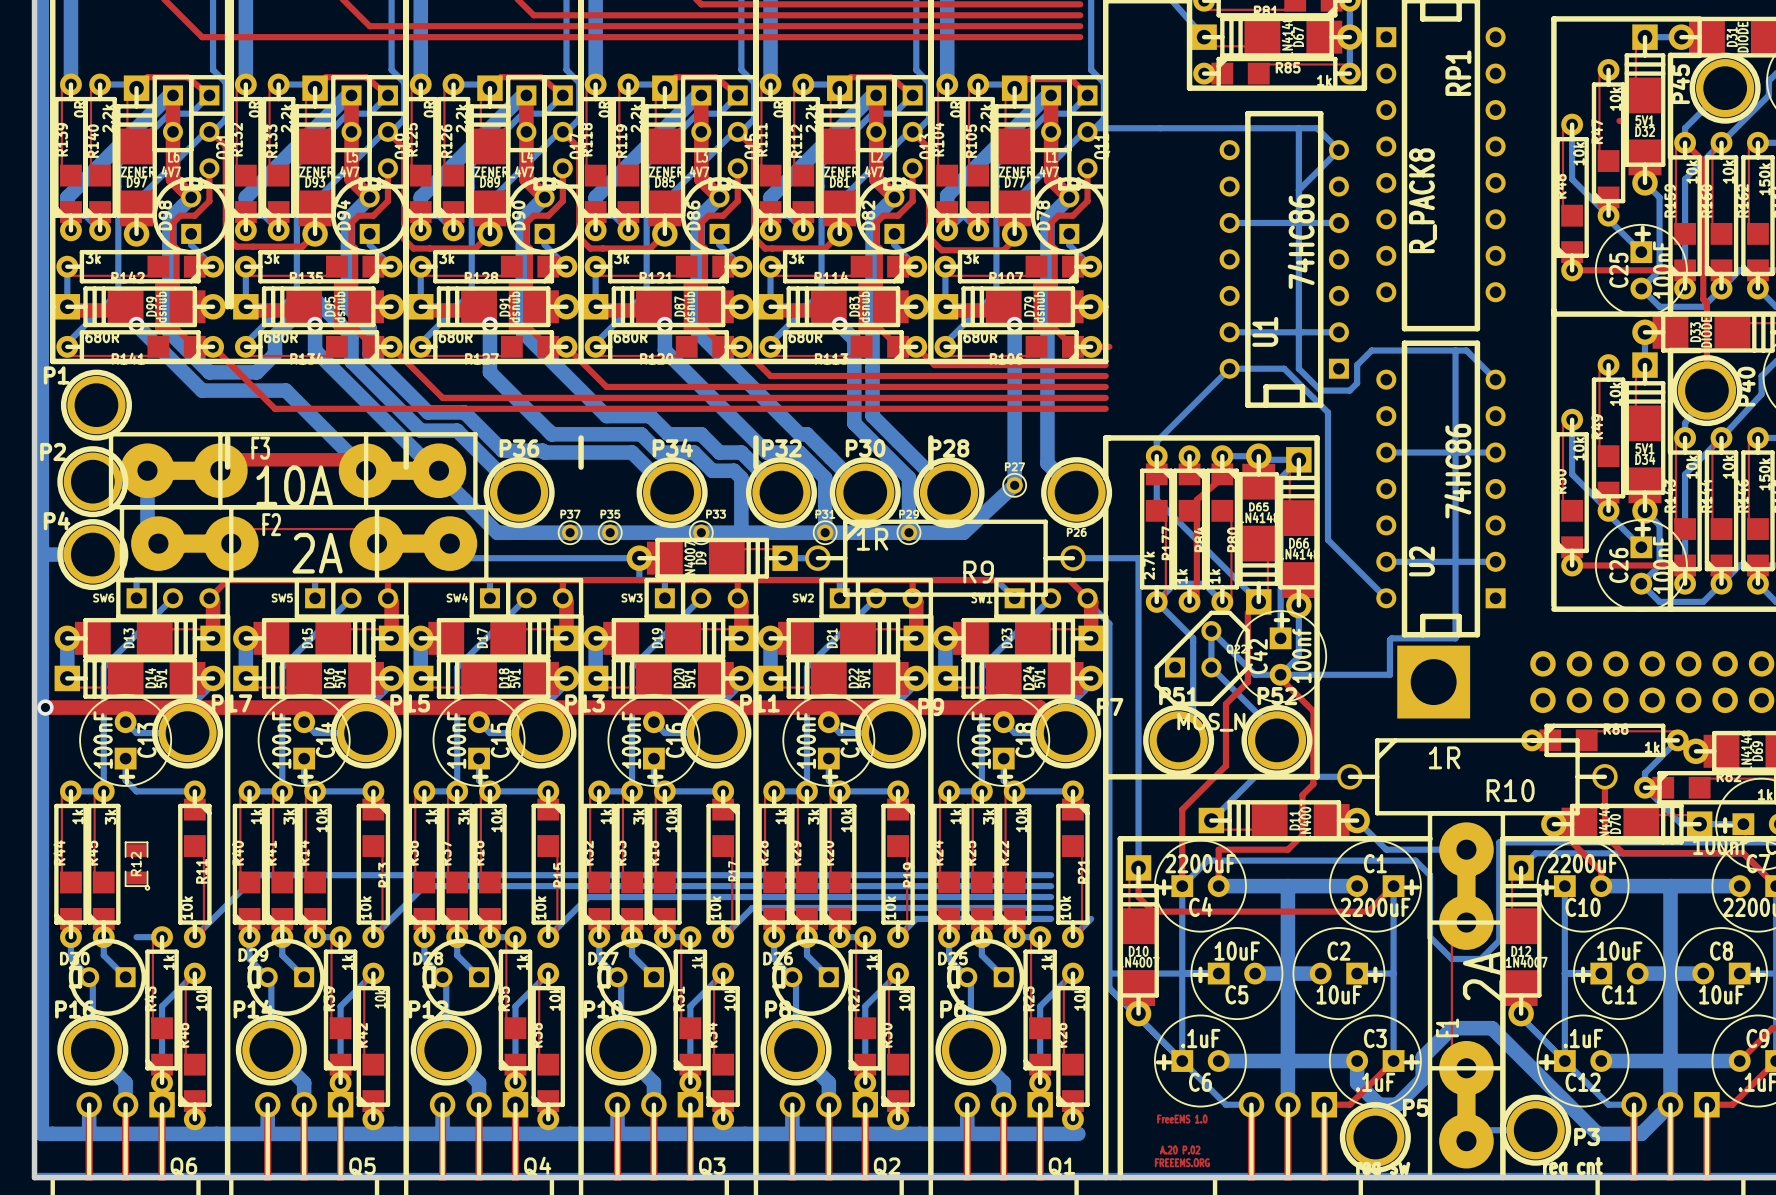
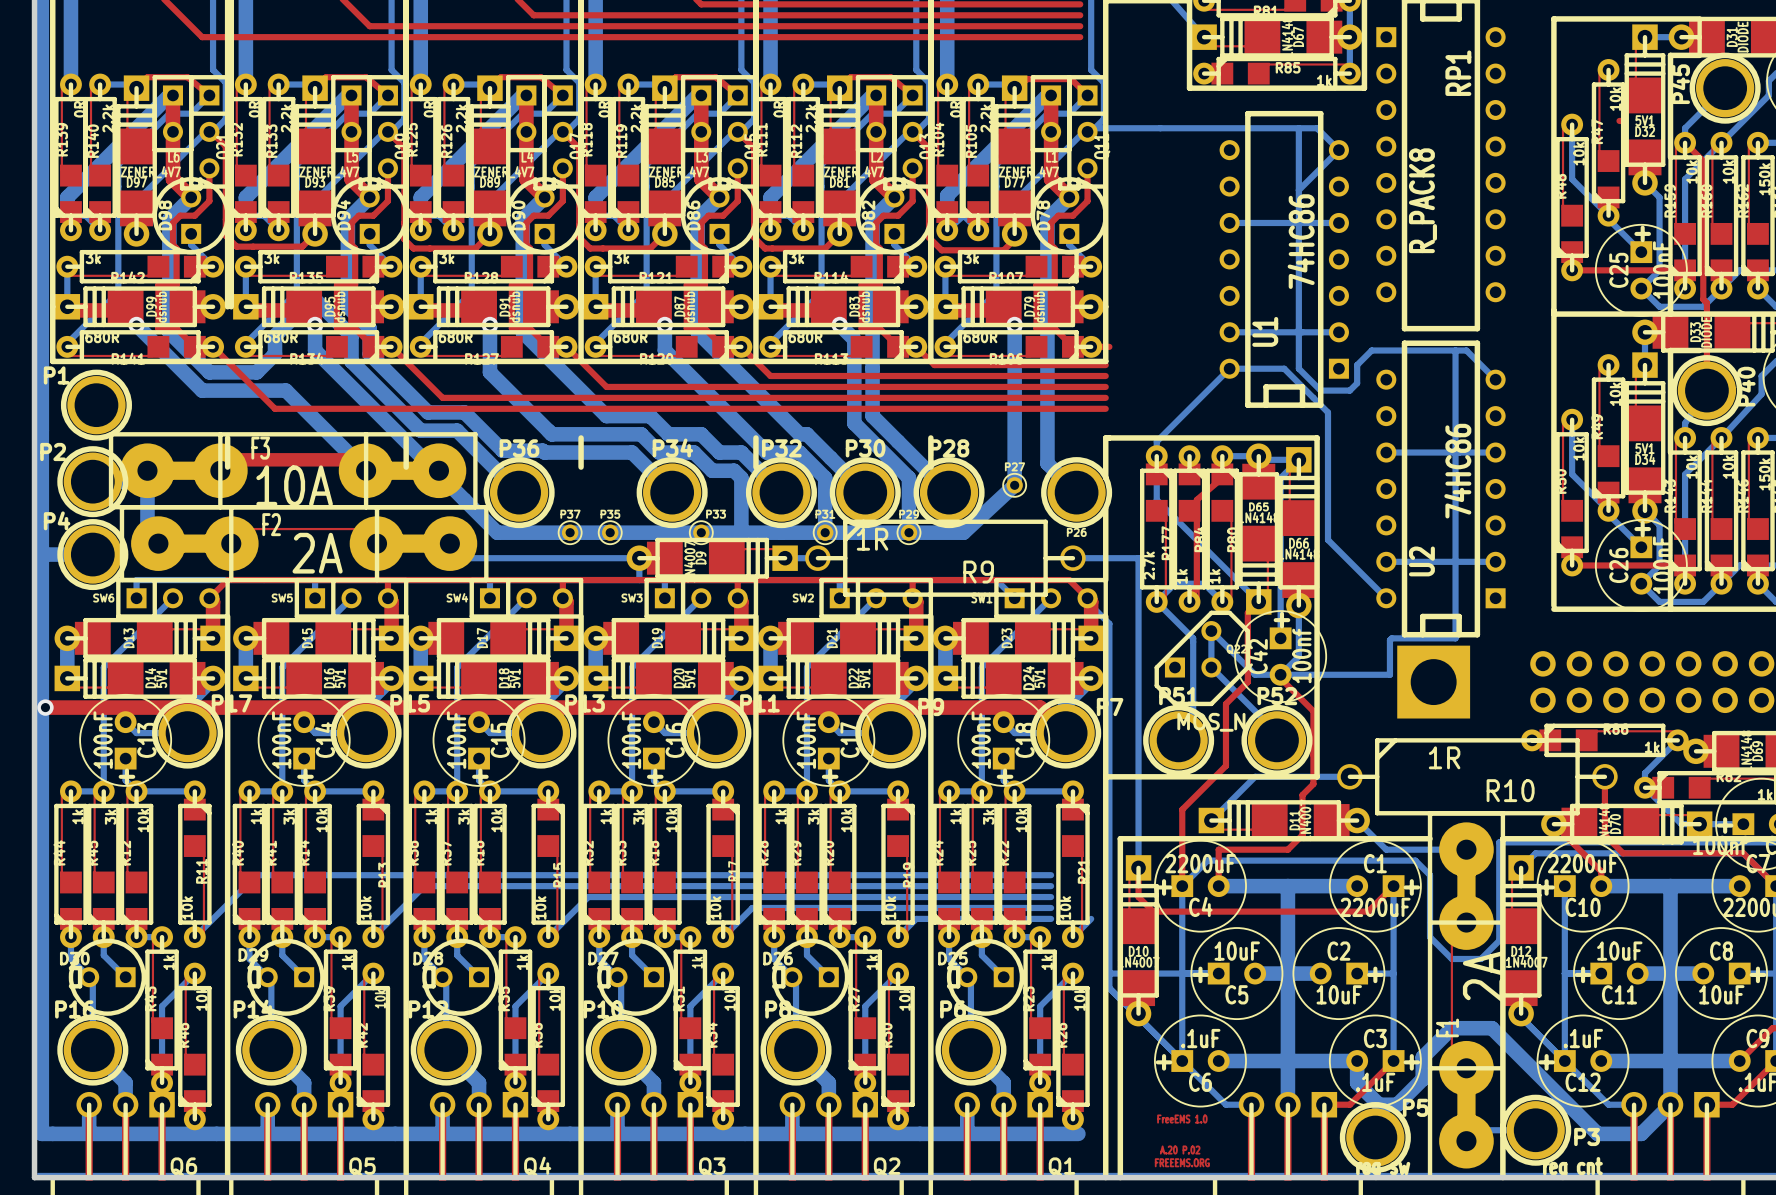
R12 value: none -> 10k (143, 820)
R12 footprint: [124, 841, 151, 891] -> [119, 780, 154, 949]

